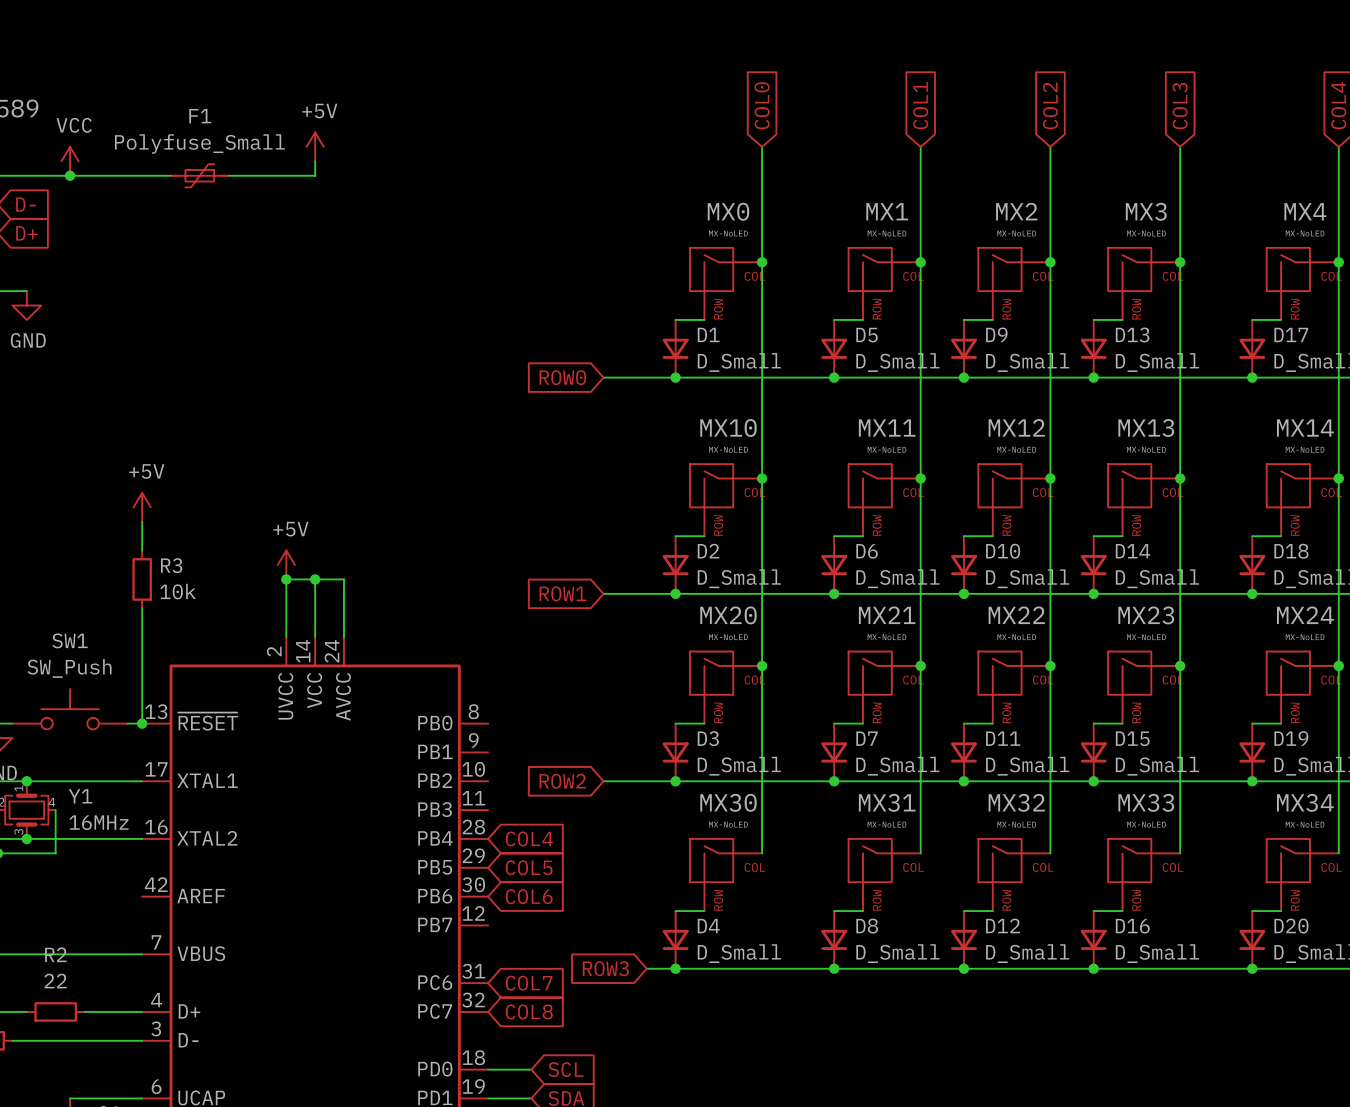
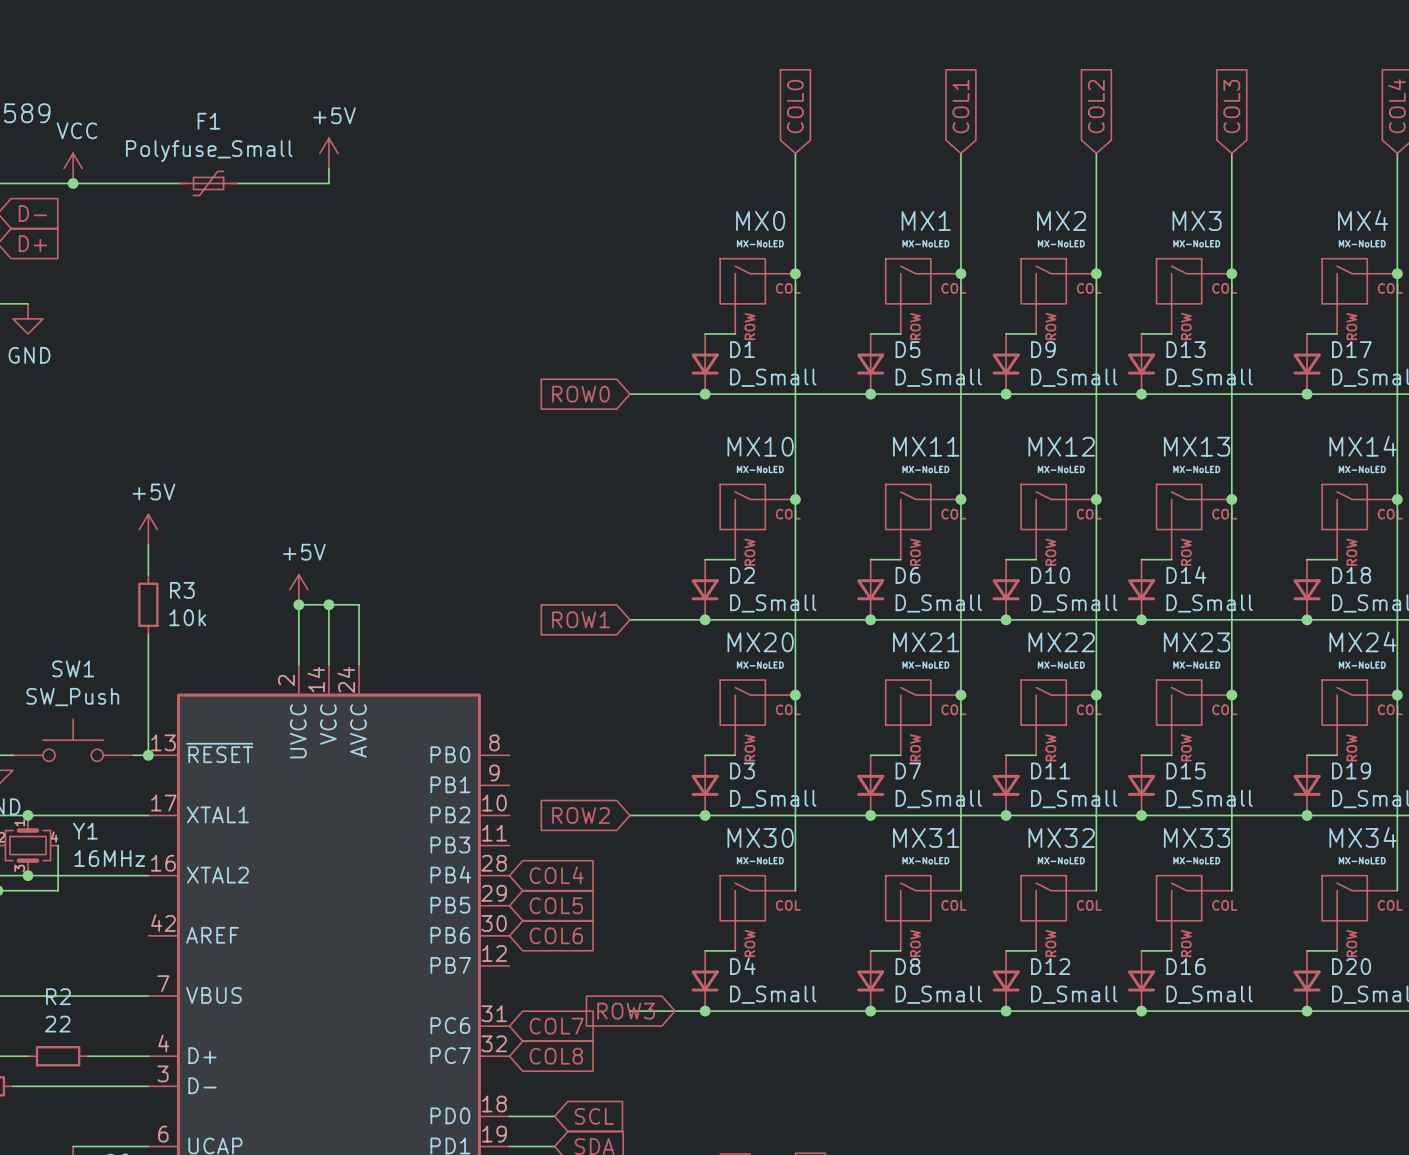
wire: none -> (629, 1011) (675, 1011)

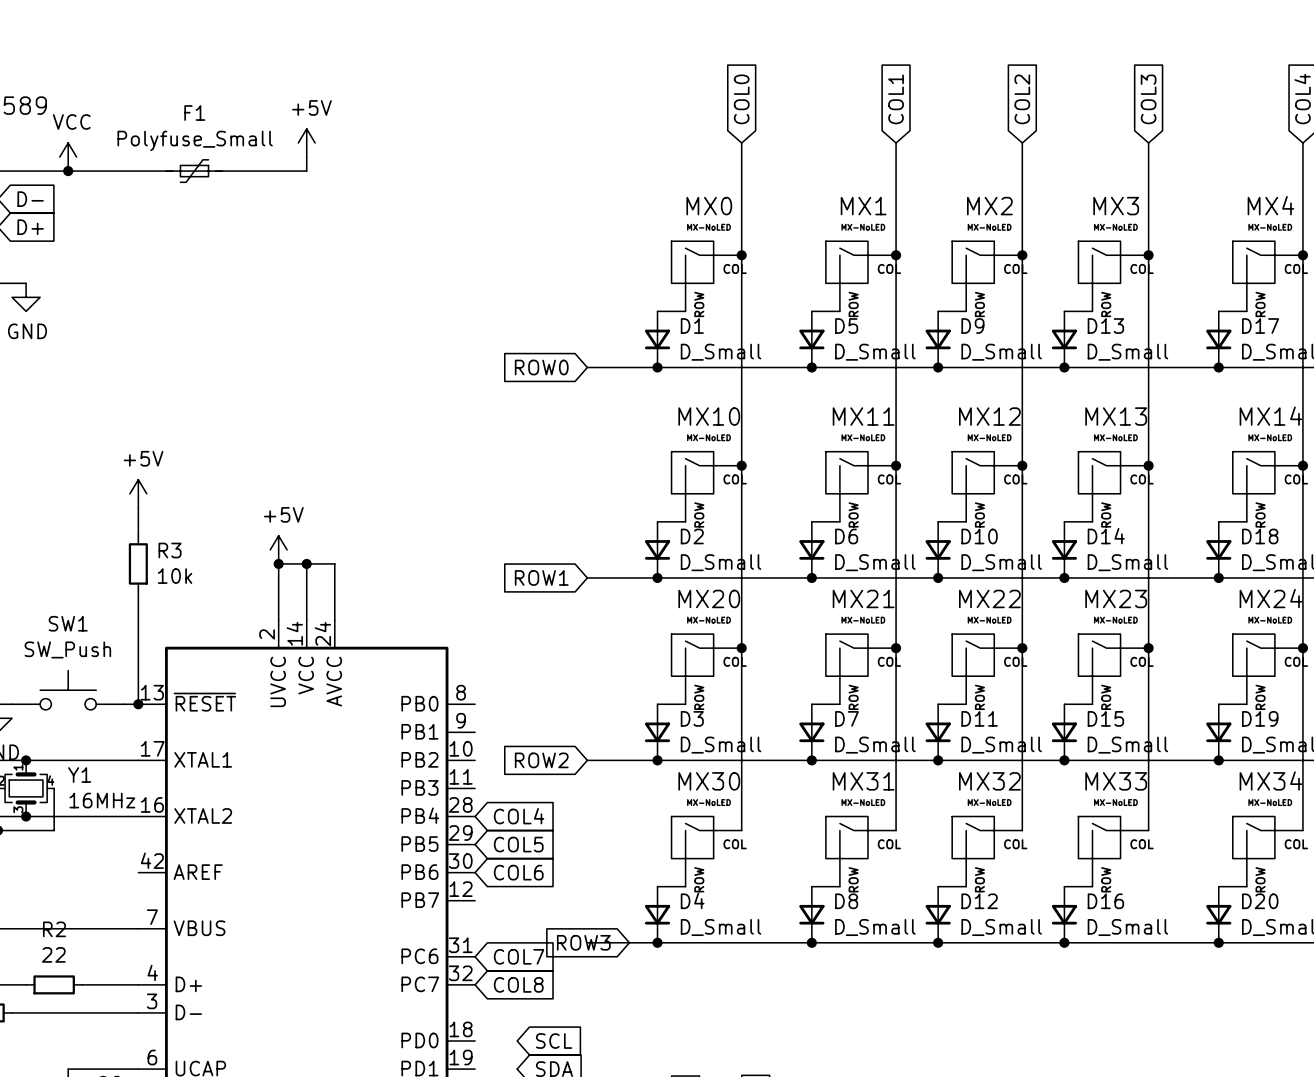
wire: (509, 1116) (554, 1116) -> none
wire: (509, 1146) (554, 1146) -> none

